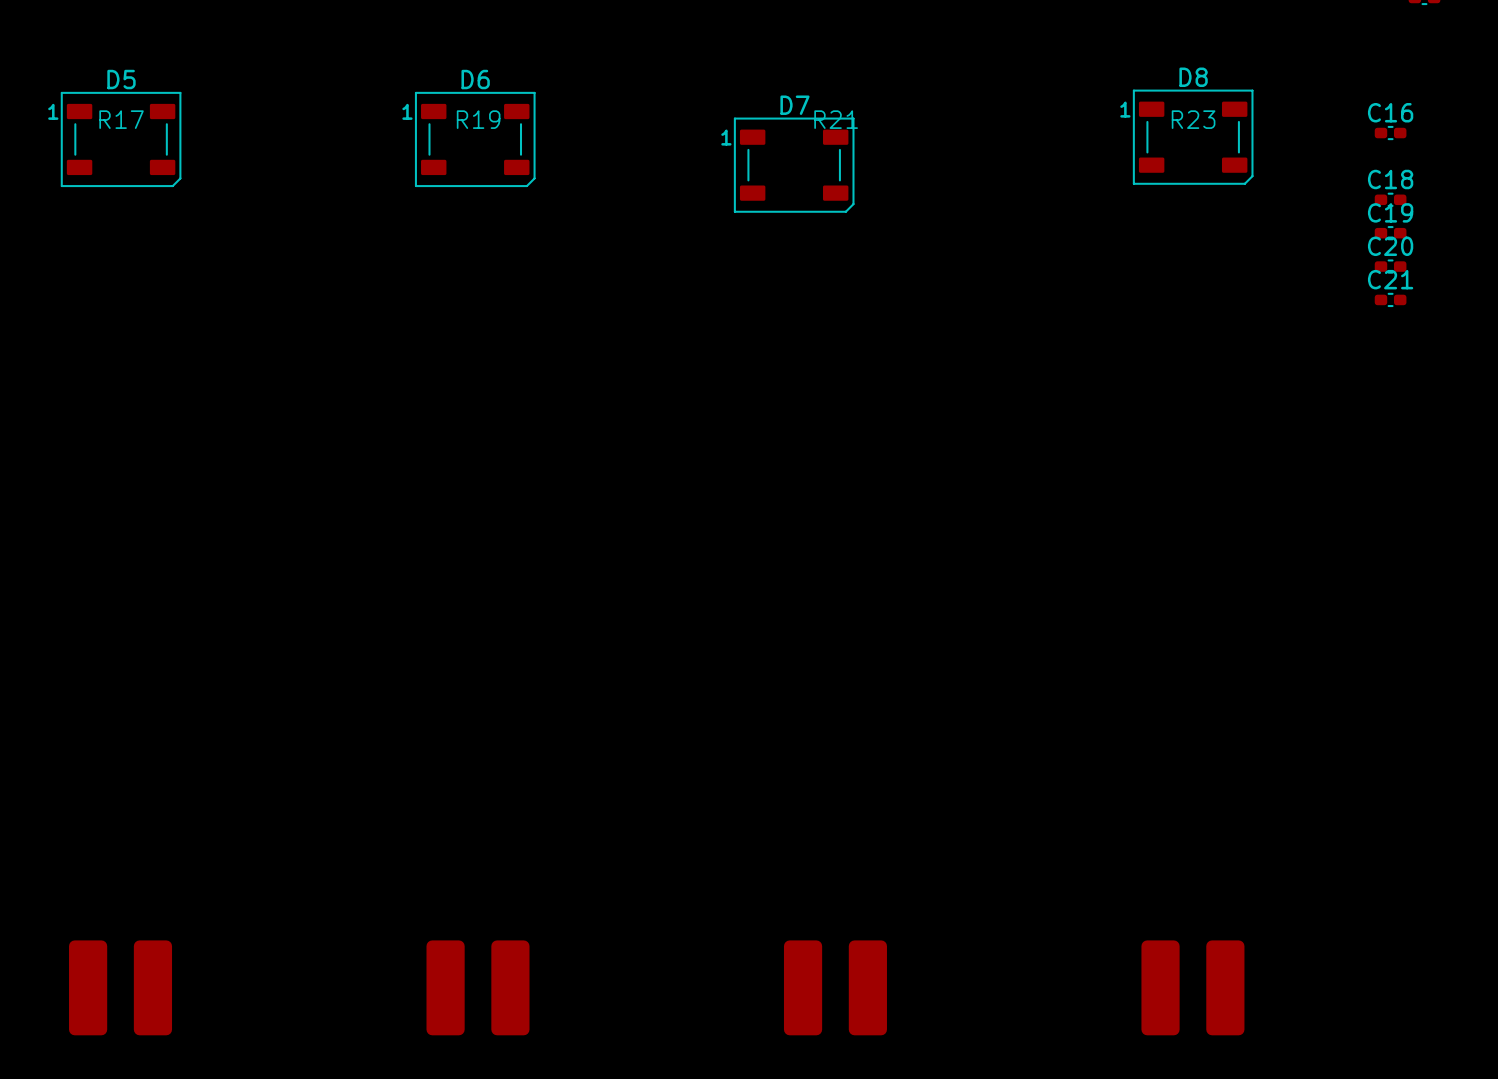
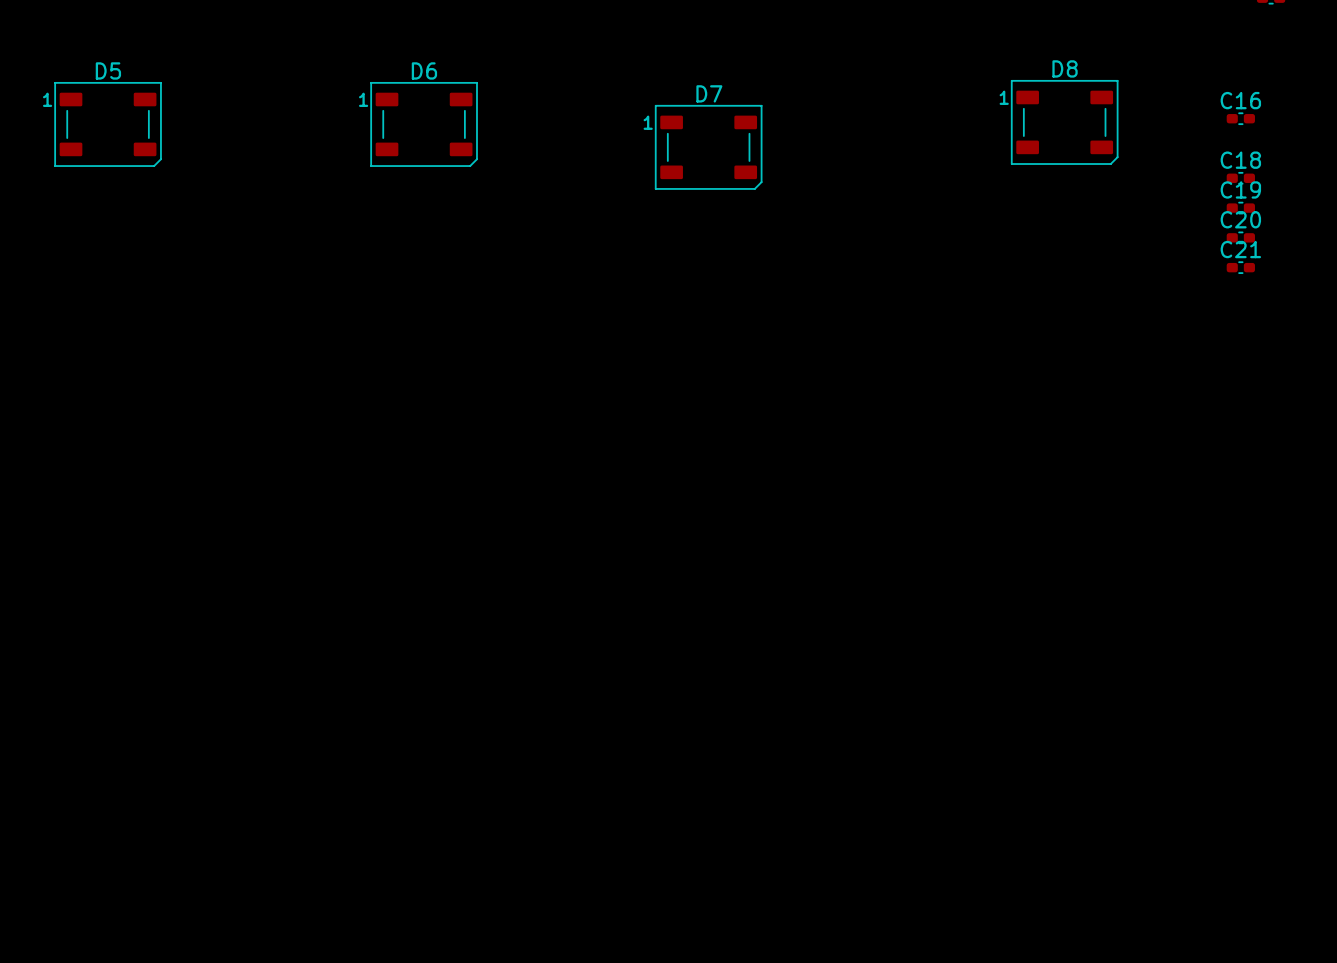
R17: (120, 987) -> none
R19: (478, 987) -> none
R21: (835, 987) -> none
R23: (1192, 987) -> none

